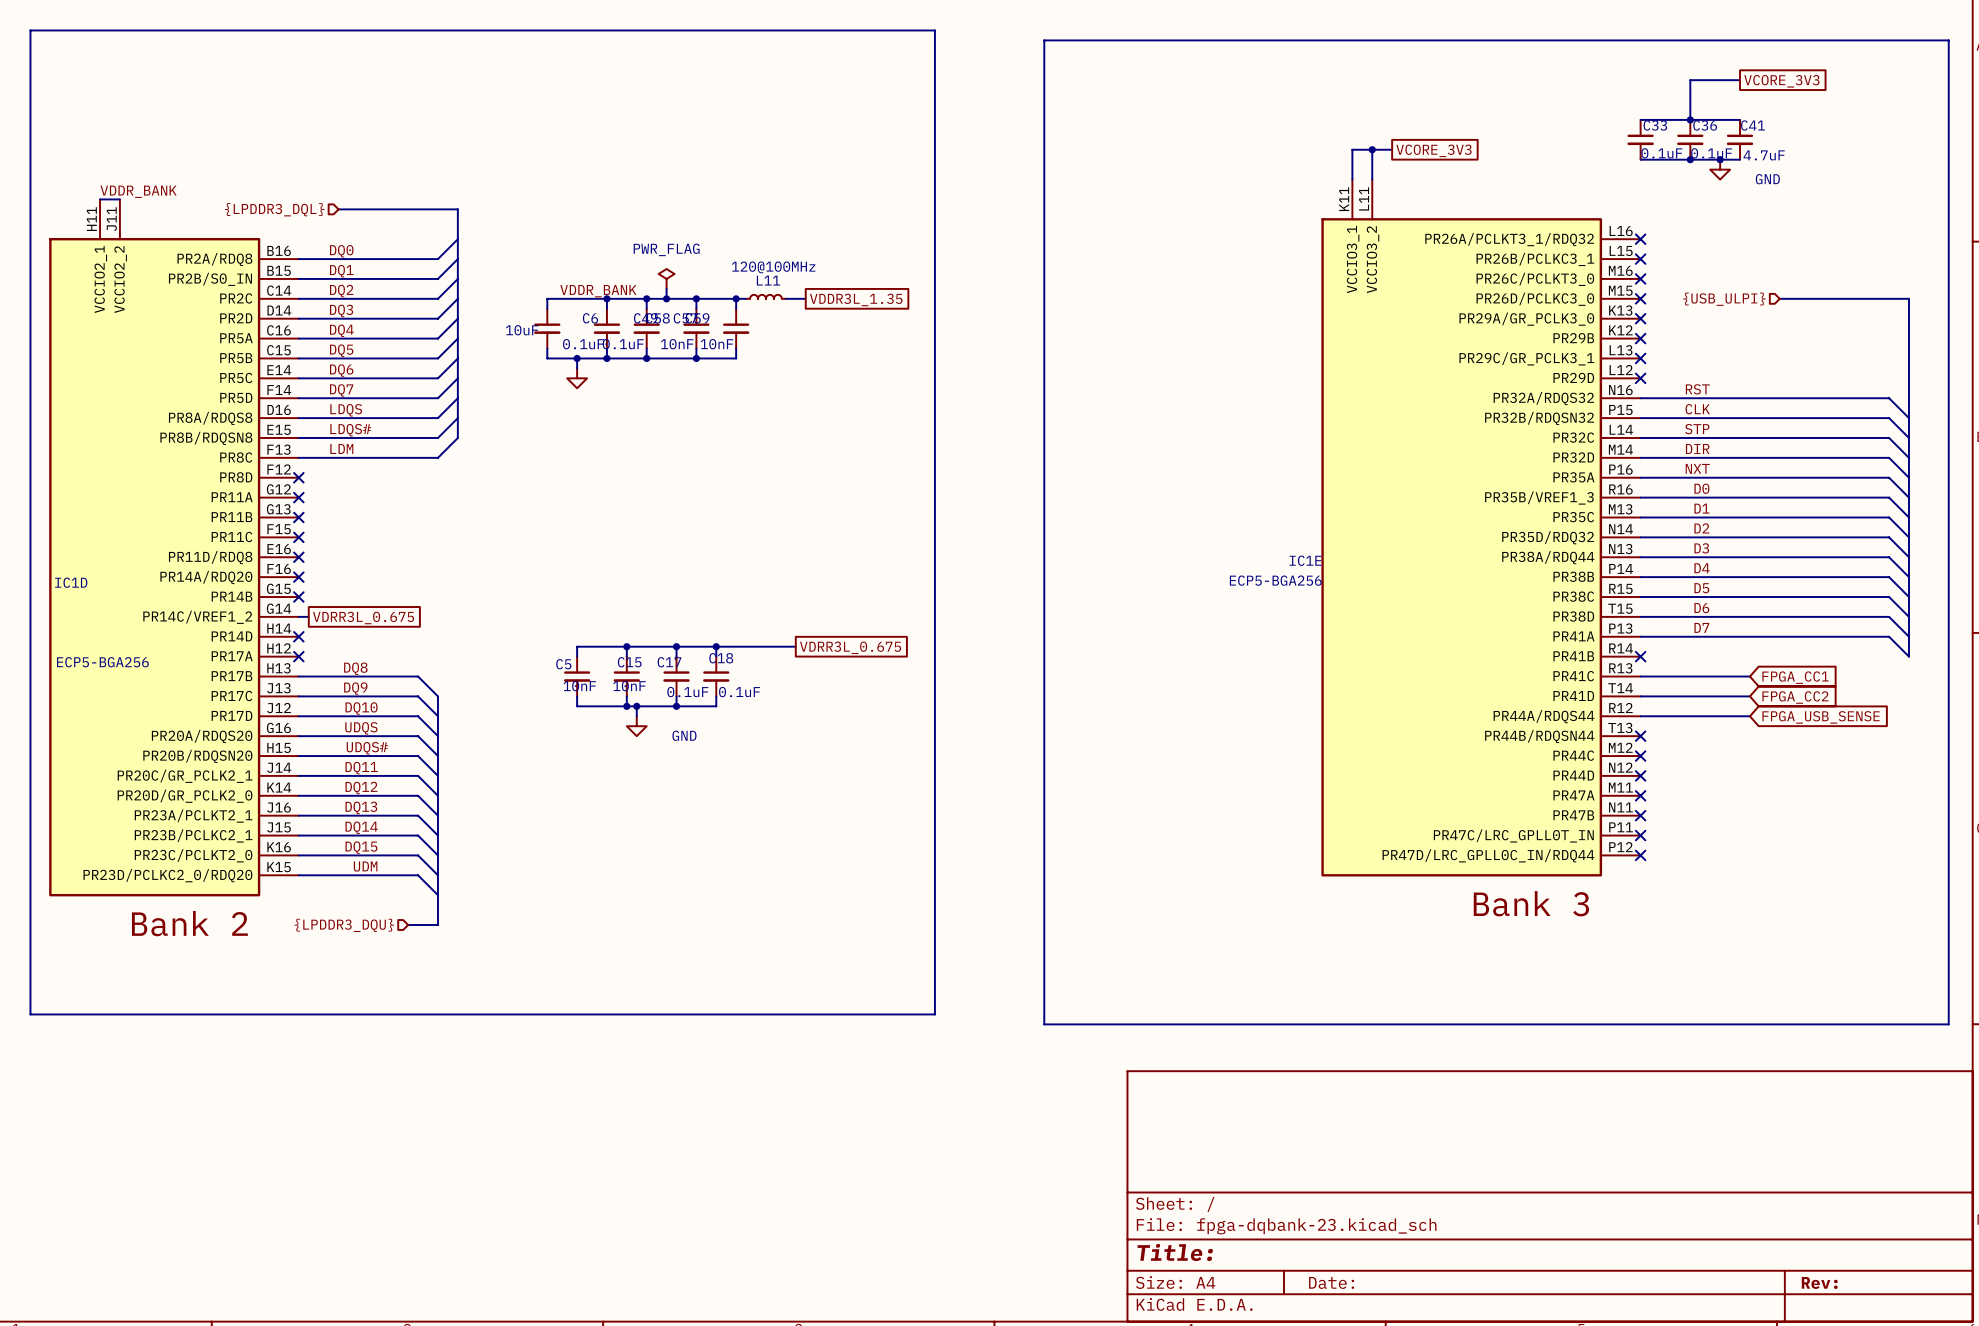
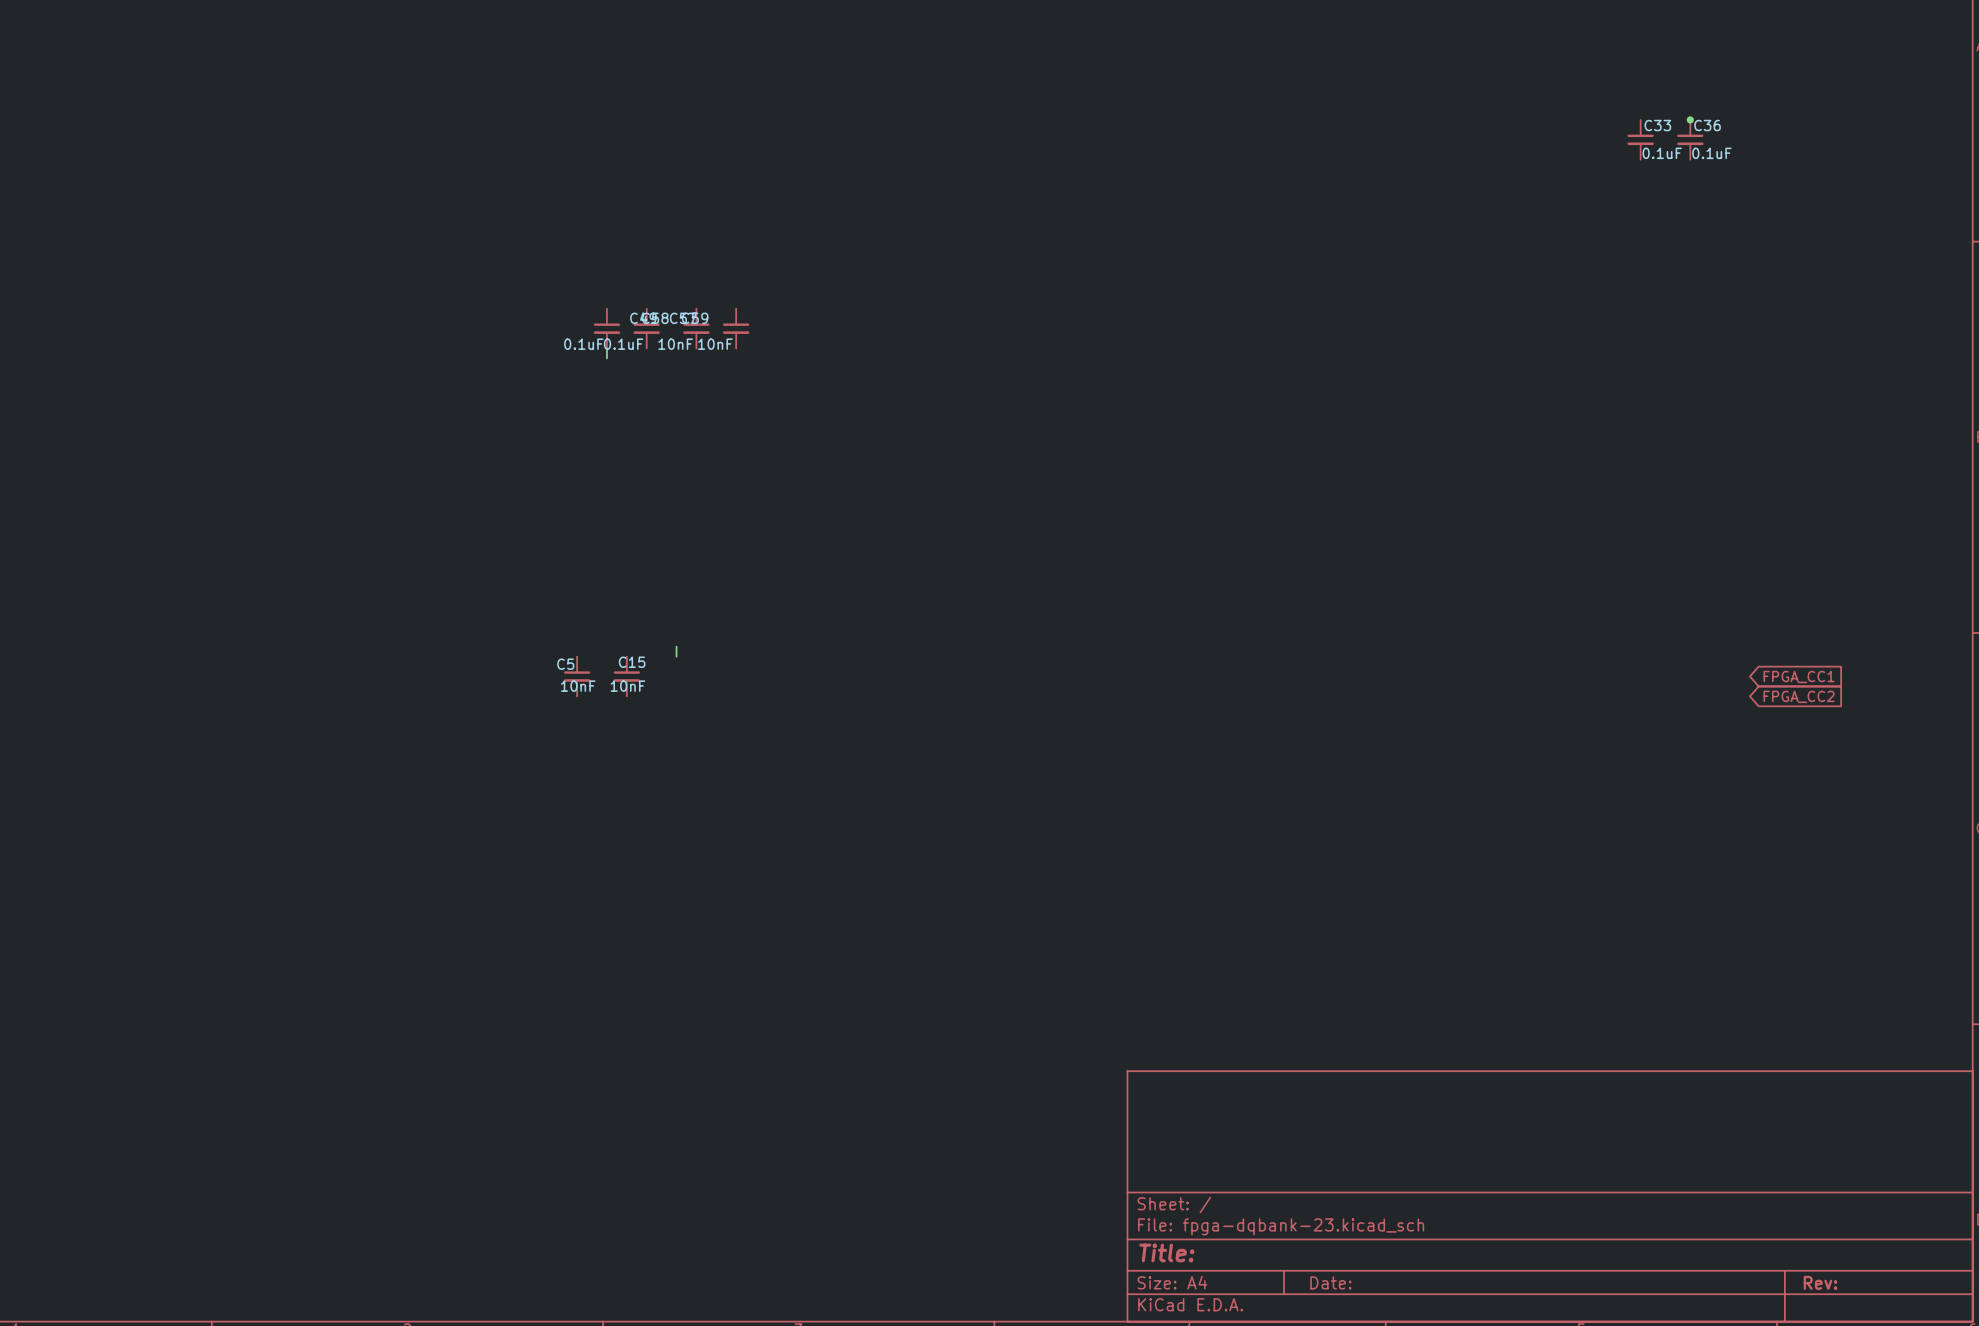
line: (30, 30) (934, 30) (934, 1014) (30, 1014) (30, 30) -> none
line: (1044, 40) (1948, 40) (1948, 1024) (1044, 1024) (1044, 40) -> none
wire: (1740, 80) (1690, 80) (1690, 119) -> none
global label: VCORE_3V3 (1781, 81) -> none
wire: (1640, 119) (1740, 119) -> none
C41: 4.7uF (1740, 139) -> none
wire: (1372, 149) (1372, 179) -> none
junction: (1372, 149) -> none
wire: (1392, 149) (1352, 149) (1352, 179) -> none
global label: VCORE_3V3 (1433, 150) -> none
wire: (1640, 159) (1740, 159) -> none
junction: (1690, 159) -> none
junction: (1720, 159) -> none
power symbol: GND (1720, 169) -> none
label: VDDR_BANK (138, 191) -> none
wire: (100, 199) (119, 199) -> none
hierarchical label: {LPDDR3_DQL} (274, 209) -> none
bus: (338, 209) (457, 209) (457, 437) -> none
wire: (457, 239) (437, 259) (298, 259) -> none
no-connect mark: (1640, 239) -> none
label: DQ0 (341, 251) -> none
wire: (457, 259) (437, 278) (298, 278) -> none
no-connect mark: (1640, 259) -> none
label: DQ1 (341, 271) -> none
wire: (457, 278) (437, 298) (298, 298) -> none
power symbol: PWR_FLAG (666, 278) -> none
no-connect mark: (1640, 278) -> none
wire: (666, 288) (666, 298) -> none
label: DQ2 (341, 291) -> none
label: VDDR_BANK (598, 291) -> none
L11: 120@100MHz (765, 296) -> none
wire: (457, 298) (437, 318) (298, 318) -> none
wire: (606, 298) (606, 308) -> none
junction: (606, 298) -> none
wire: (646, 298) (646, 308) -> none
junction: (646, 298) -> none
junction: (666, 298) -> none
wire: (696, 298) (696, 308) -> none
junction: (696, 298) -> none
wire: (736, 298) (736, 308) -> none
junction: (736, 298) -> none
wire: (746, 298) (547, 298) (547, 308) -> none
wire: (785, 298) (805, 298) -> none
no-connect mark: (1640, 298) -> none
bus: (1779, 298) (1908, 298) (1908, 656) -> none
global label: VDDR3L_1.35 (856, 299) -> none
hierarchical label: {USB_ULPI} (1724, 299) -> none
label: DQ3 (341, 310) -> none
wire: (457, 318) (437, 338) (298, 338) -> none
no-connect mark: (1640, 318) -> none
C6: 10uF (547, 328) -> none
label: DQ4 (341, 330) -> none
wire: (457, 338) (437, 358) (298, 358) -> none
no-connect mark: (1640, 338) -> none
wire: (547, 348) (547, 358) (736, 358) (736, 348) -> none
wire: (646, 348) (646, 358) -> none
wire: (696, 348) (696, 358) -> none
label: DQ5 (341, 350) -> none
wire: (457, 358) (437, 378) (298, 378) -> none
wire: (577, 358) (577, 368) -> none
junction: (577, 358) -> none
junction: (606, 358) -> none
junction: (646, 358) -> none
junction: (696, 358) -> none
no-connect mark: (1640, 358) -> none
label: DQ6 (341, 370) -> none
wire: (457, 378) (437, 398) (298, 398) -> none
power symbol: (577, 378) -> none
no-connect mark: (1640, 378) -> none
label: RST (1697, 389) -> none
label: DQ7 (341, 390) -> none
wire: (457, 398) (437, 418) (298, 418) -> none
wire: (1640, 398) (1889, 398) (1908, 418) -> none
label: CLK (1697, 409) -> none
label: LDQS (346, 410) -> none
wire: (457, 418) (437, 437) (298, 437) -> none
wire: (1640, 418) (1889, 418) (1908, 437) -> none
label: STP (1697, 429) -> none
label: LDQS# (350, 430) -> none
wire: (457, 437) (437, 457) (298, 457) -> none
wire: (1640, 437) (1889, 437) (1908, 457) -> none
label: LDM (341, 448) -> none
label: DIR (1697, 448) -> none
wire: (1640, 457) (1889, 457) (1908, 477) -> none
label: NXT (1697, 468) -> none
no-connect mark: (298, 477) -> none
wire: (1640, 477) (1889, 477) (1908, 497) -> none
label: D0 (1701, 488) -> none
no-connect mark: (298, 497) -> none
wire: (1640, 497) (1889, 497) (1908, 517) -> none
label: D1 (1701, 508) -> none
no-connect mark: (298, 517) -> none
wire: (1640, 517) (1889, 517) (1908, 537) -> none
IC1E: ECP5-BGA256 (1481, 528) -> none
label: D2 (1701, 528) -> none
no-connect mark: (298, 537) -> none
wire: (1640, 537) (1889, 537) (1908, 557) -> none
IC1D: ECP5-BGA256 (173, 547) -> none
label: D3 (1701, 548) -> none
no-connect mark: (298, 557) -> none
wire: (1640, 557) (1889, 557) (1908, 577) -> none
label: D4 (1702, 568) -> none
no-connect mark: (298, 577) -> none
wire: (1640, 577) (1889, 577) (1908, 597) -> none
label: D5 (1701, 588) -> none
no-connect mark: (298, 597) -> none
wire: (1640, 597) (1889, 597) (1908, 616) -> none
label: D6 (1701, 608) -> none
wire: (298, 616) (308, 616) -> none
wire: (1640, 616) (1889, 616) (1908, 636) -> none
global label: VDRR3L_0.675 (363, 618) -> none
label: D7 (1701, 627) -> none
no-connect mark: (298, 636) -> none
wire: (1640, 636) (1889, 636) (1908, 656) -> none
wire: (626, 646) (626, 656) -> none
junction: (626, 646) -> none
junction: (676, 646) -> none
wire: (716, 646) (716, 656) -> none
junction: (716, 646) -> none
wire: (795, 646) (577, 646) (577, 656) -> none
global label: VDRR3L_0.675 (850, 647) -> none
no-connect mark: (298, 656) -> none
no-connect mark: (1640, 656) -> none
label: DQ8 (355, 668) -> none
wire: (298, 676) (418, 676) (437, 696) -> none
C17: 0.1uF (676, 676) -> none
C18: 0.1uF (716, 676) -> none
wire: (1640, 676) (1749, 676) -> none
label: DQ9 (355, 688) -> none
wire: (298, 696) (418, 696) (437, 716) -> none
bus: (437, 696) (437, 925) (408, 925) -> none
wire: (577, 696) (577, 706) (716, 706) (716, 696) -> none
wire: (626, 696) (626, 706) -> none
wire: (676, 696) (676, 706) -> none
wire: (1640, 696) (1749, 696) -> none
junction: (626, 706) -> none
wire: (636, 706) (636, 716) -> none
junction: (636, 706) -> none
junction: (676, 706) -> none
label: DQ10 (361, 708) -> none
wire: (298, 716) (418, 716) (437, 736) -> none
wire: (1640, 716) (1749, 716) -> none
global label: FPGA_USB_SENSE (1821, 717) -> none
power symbol: GND (636, 726) -> none
label: UDQS (361, 728) -> none
wire: (298, 736) (418, 736) (437, 756) -> none
no-connect mark: (1640, 736) -> none
label: UDQS# (367, 748) -> none
wire: (298, 756) (418, 756) (437, 775) -> none
no-connect mark: (1640, 756) -> none
label: DQ11 (361, 768) -> none
wire: (298, 775) (418, 775) (437, 795) -> none
no-connect mark: (1640, 775) -> none
label: DQ12 (361, 788) -> none
wire: (298, 795) (418, 795) (437, 815) -> none
no-connect mark: (1640, 795) -> none
label: DQ13 (361, 807) -> none
wire: (298, 815) (418, 815) (437, 835) -> none
no-connect mark: (1640, 815) -> none
label: DQ14 (361, 827) -> none
wire: (298, 835) (418, 835) (437, 855) -> none
no-connect mark: (1640, 835) -> none
label: DQ15 (361, 847) -> none
wire: (298, 855) (418, 855) (437, 875) -> none
no-connect mark: (1640, 855) -> none
label: UDM (365, 866) -> none
wire: (298, 875) (418, 875) (437, 895) -> none
hierarchical label: {LPDDR3_DQU} (344, 925) -> none

